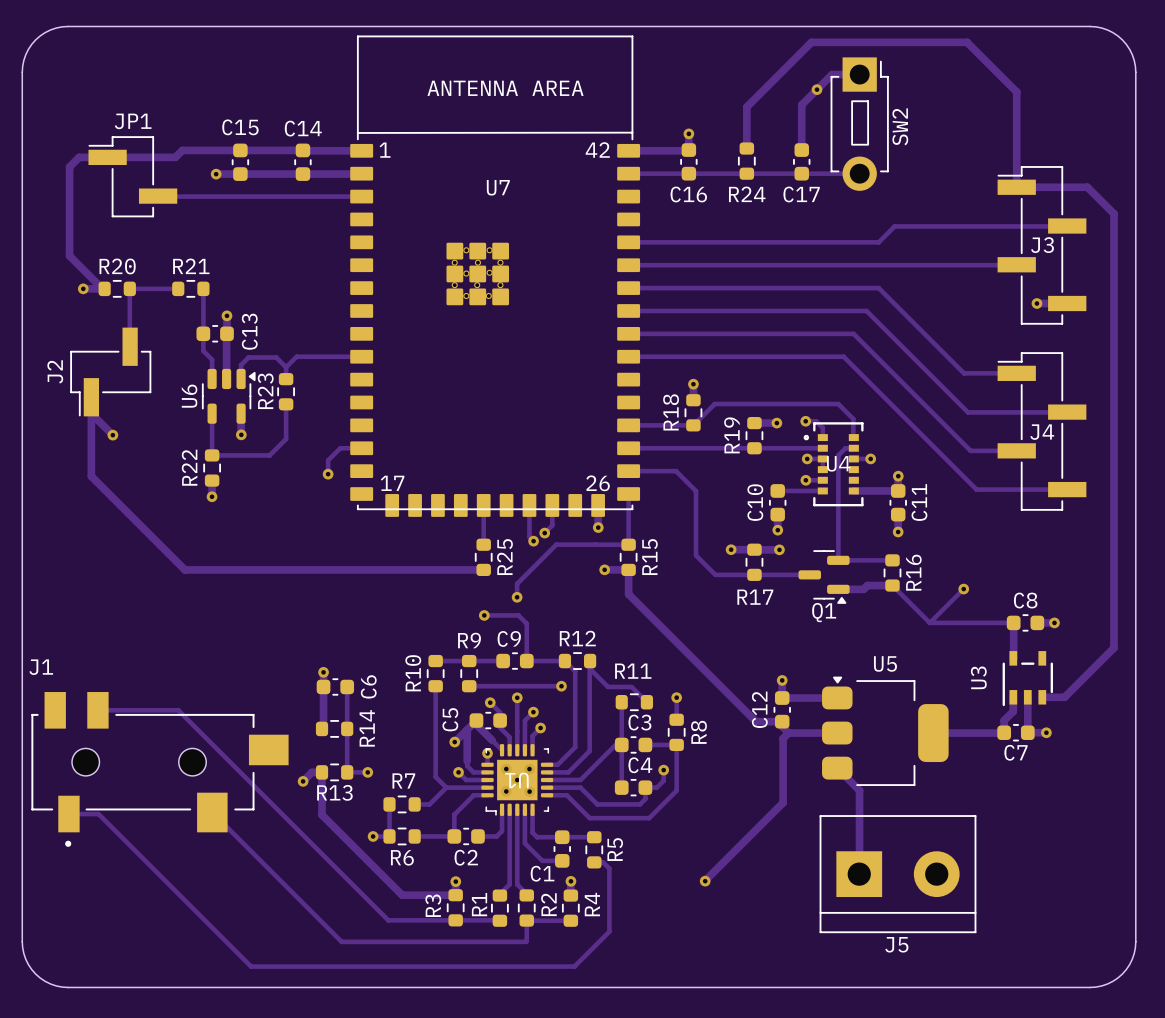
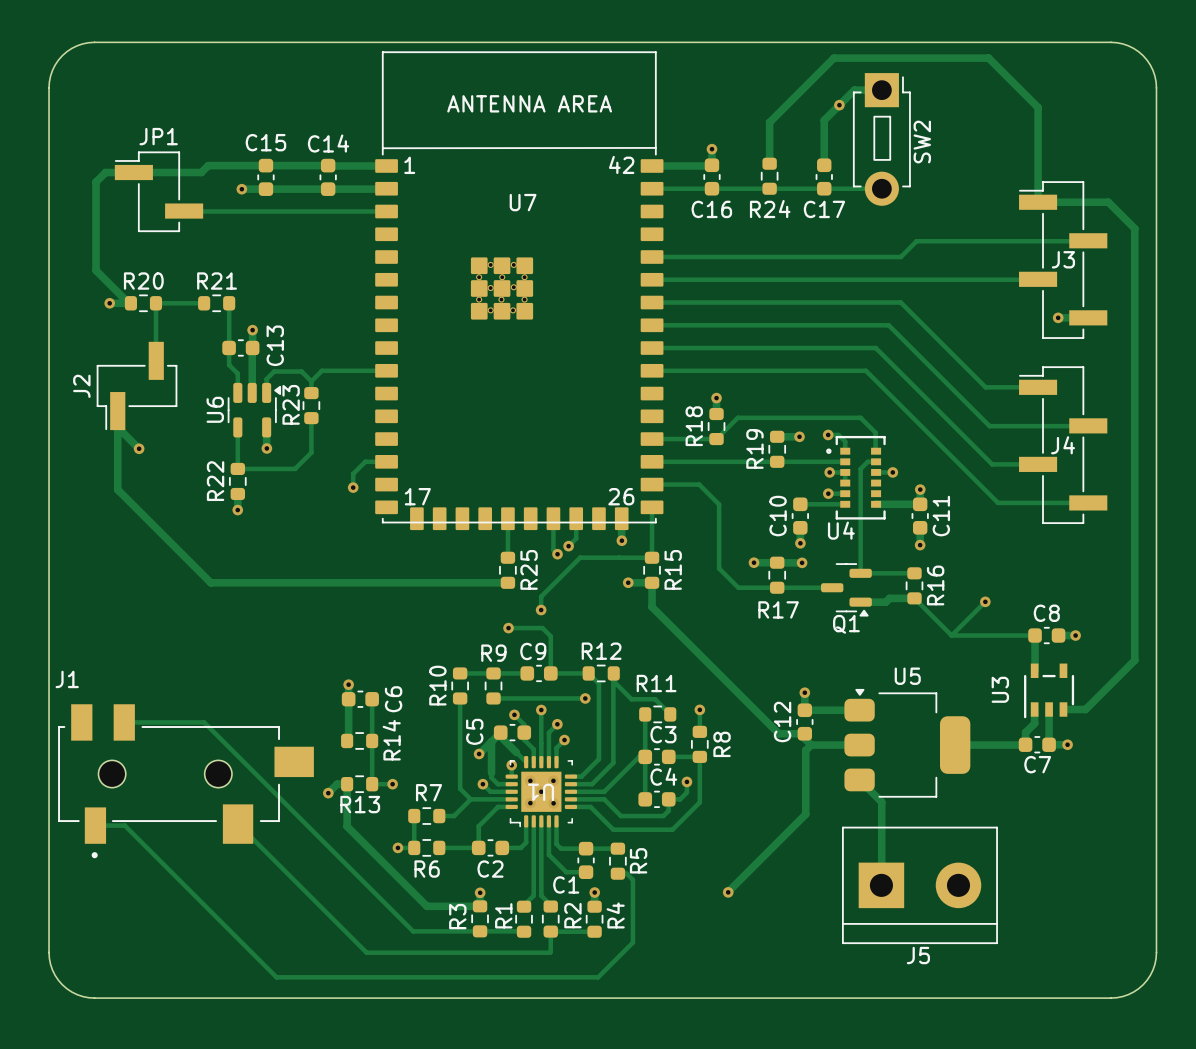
U4 name position: U4 (838, 463) -> U4 (841, 530)

